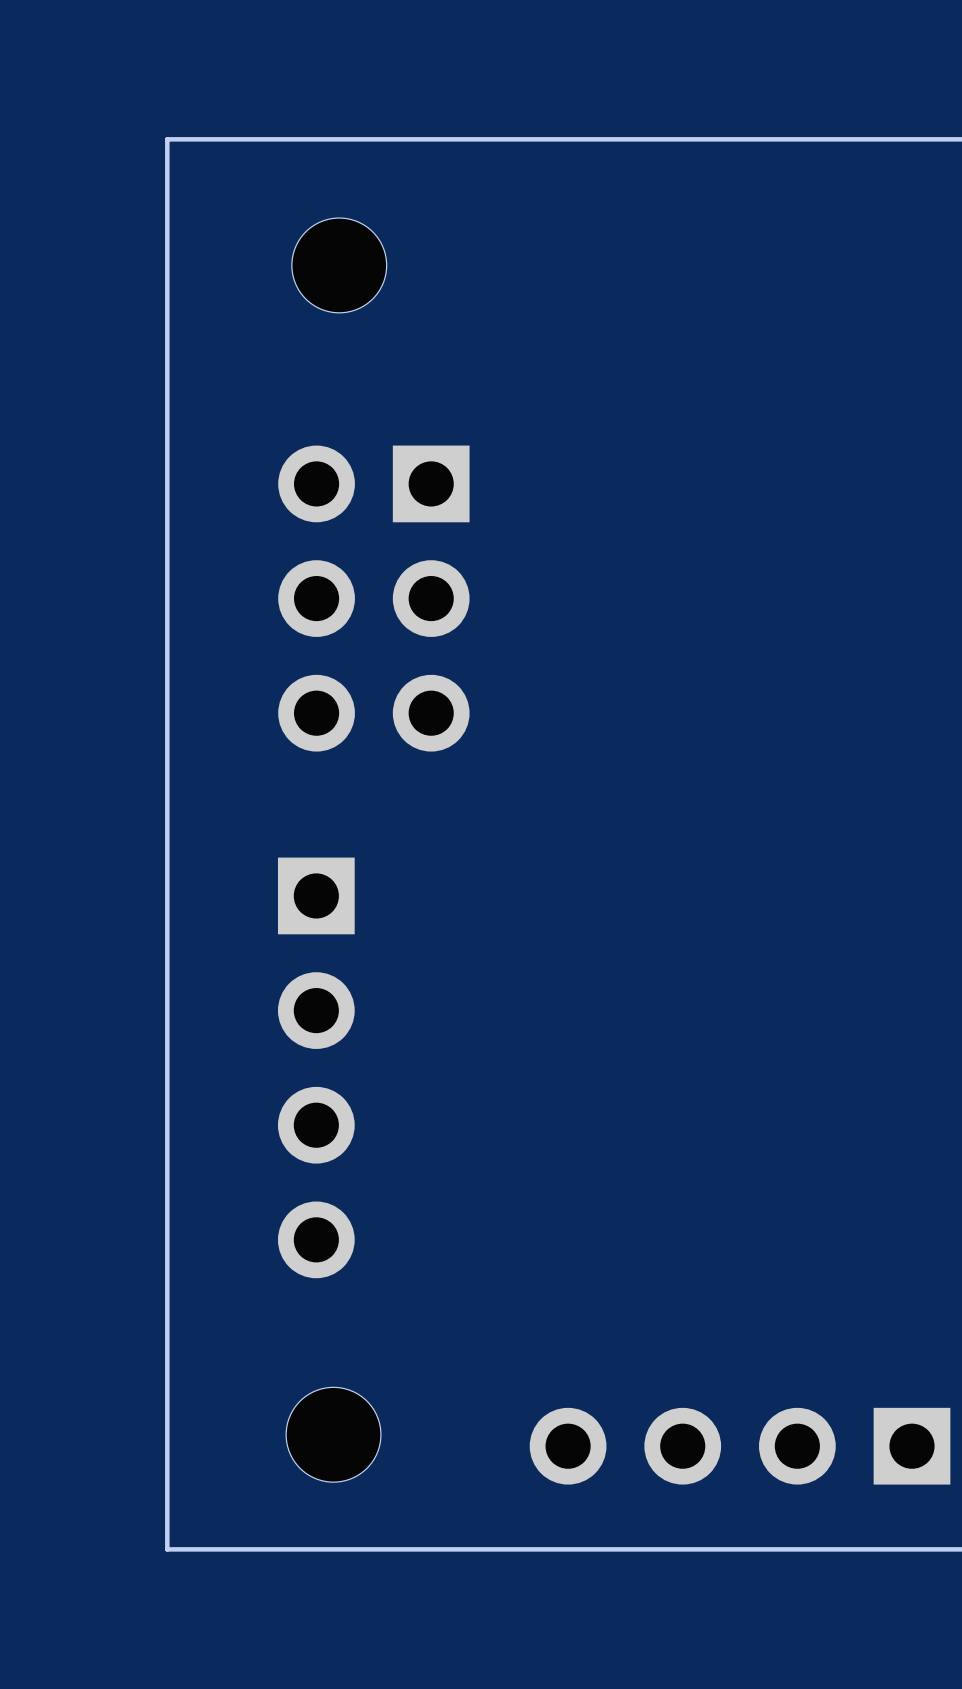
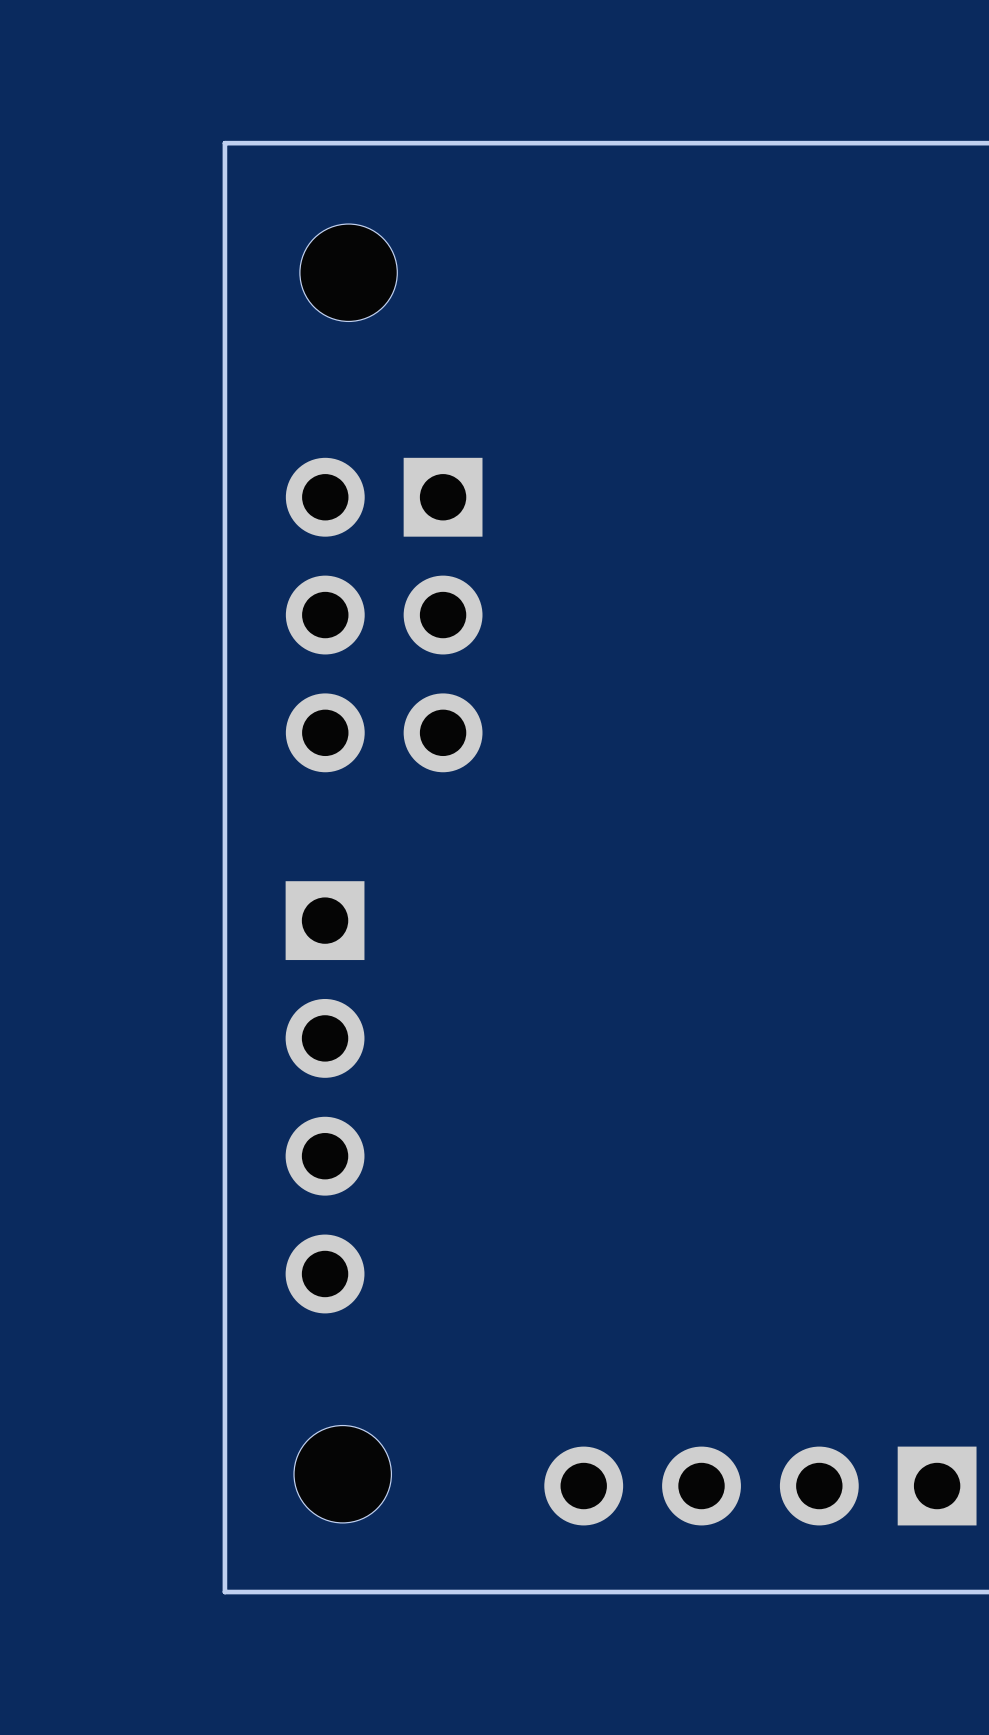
board edge: (218, 139) (167, 139) (167, 1549) (218, 1549) -> (224, 143) (224, 1592)

